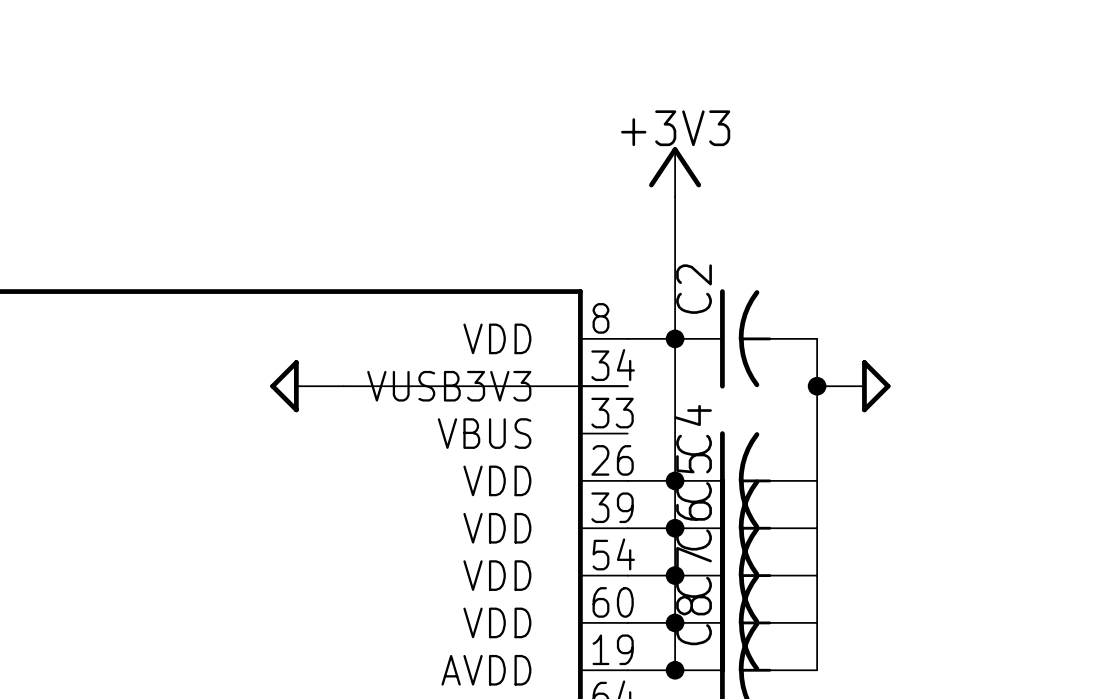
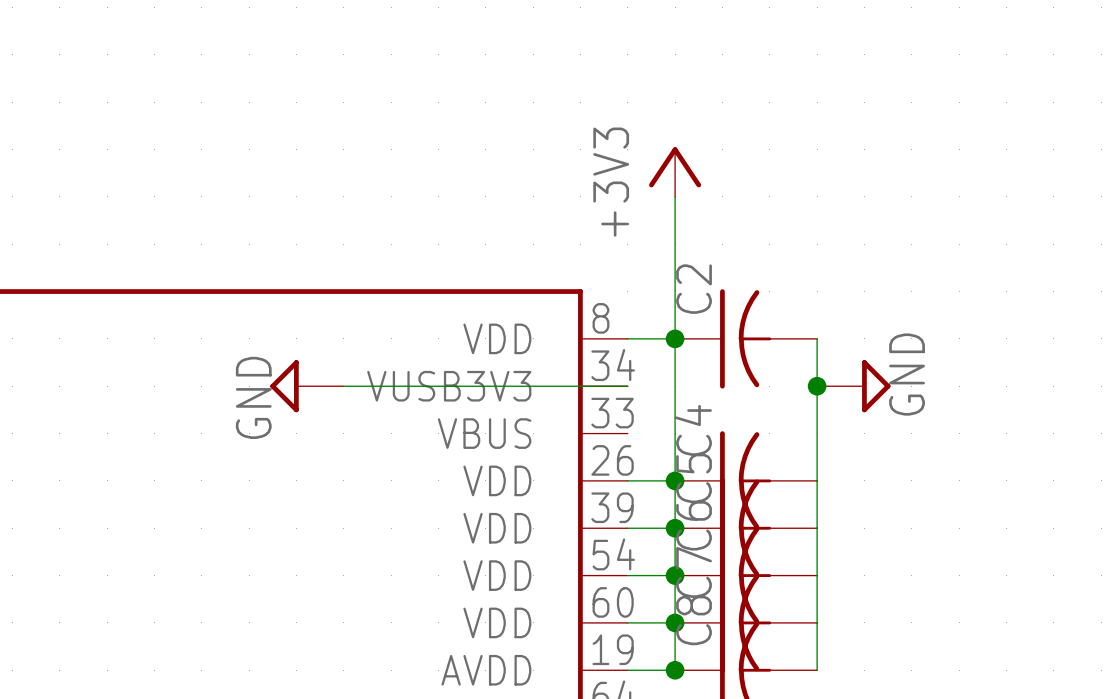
power symbol text rotation: 0° (675, 128) -> 90° counterclockwise (611, 182)
power symbol text: none -> GND (907, 374)
power symbol text: none -> GND (253, 397)

